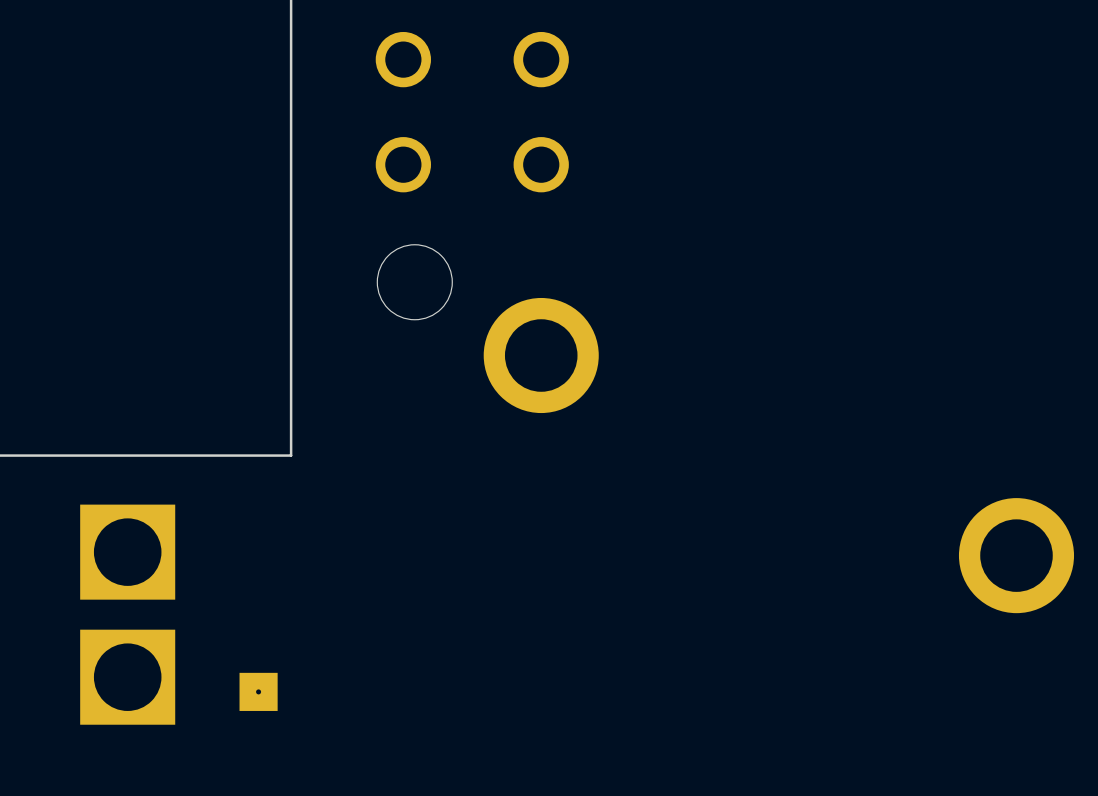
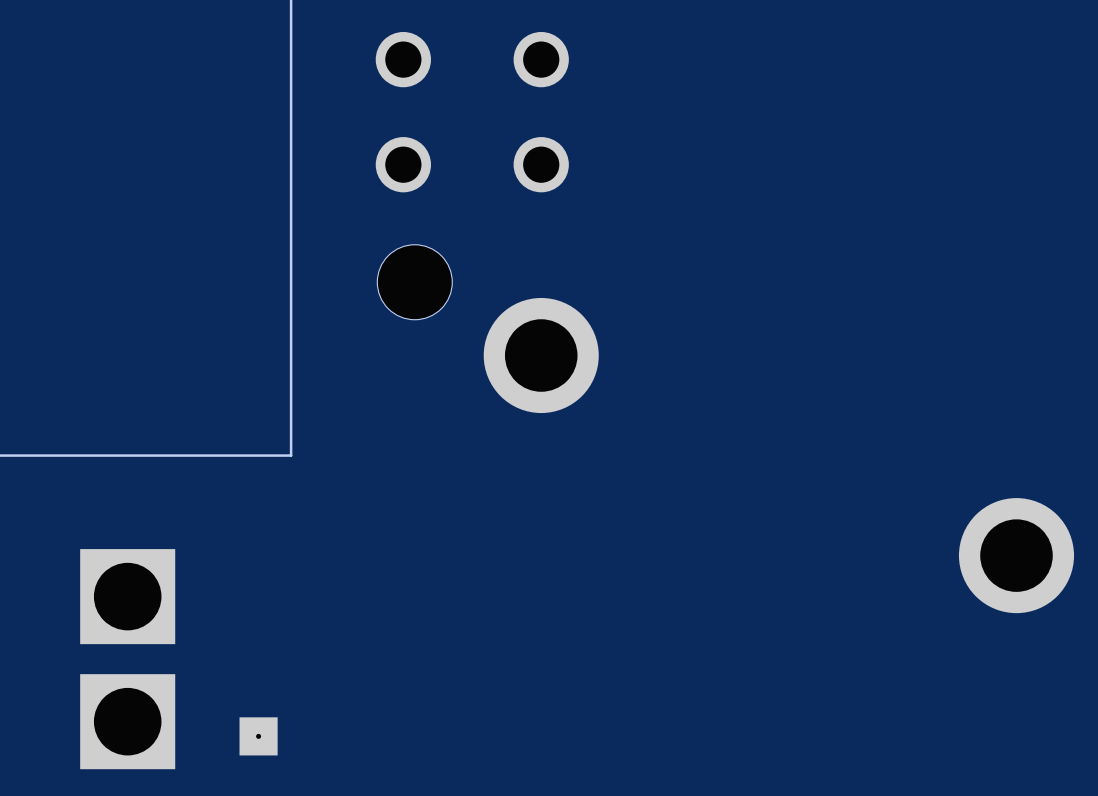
part position: (127, 614) -> (127, 659)
part position: (258, 691) -> (258, 736)

